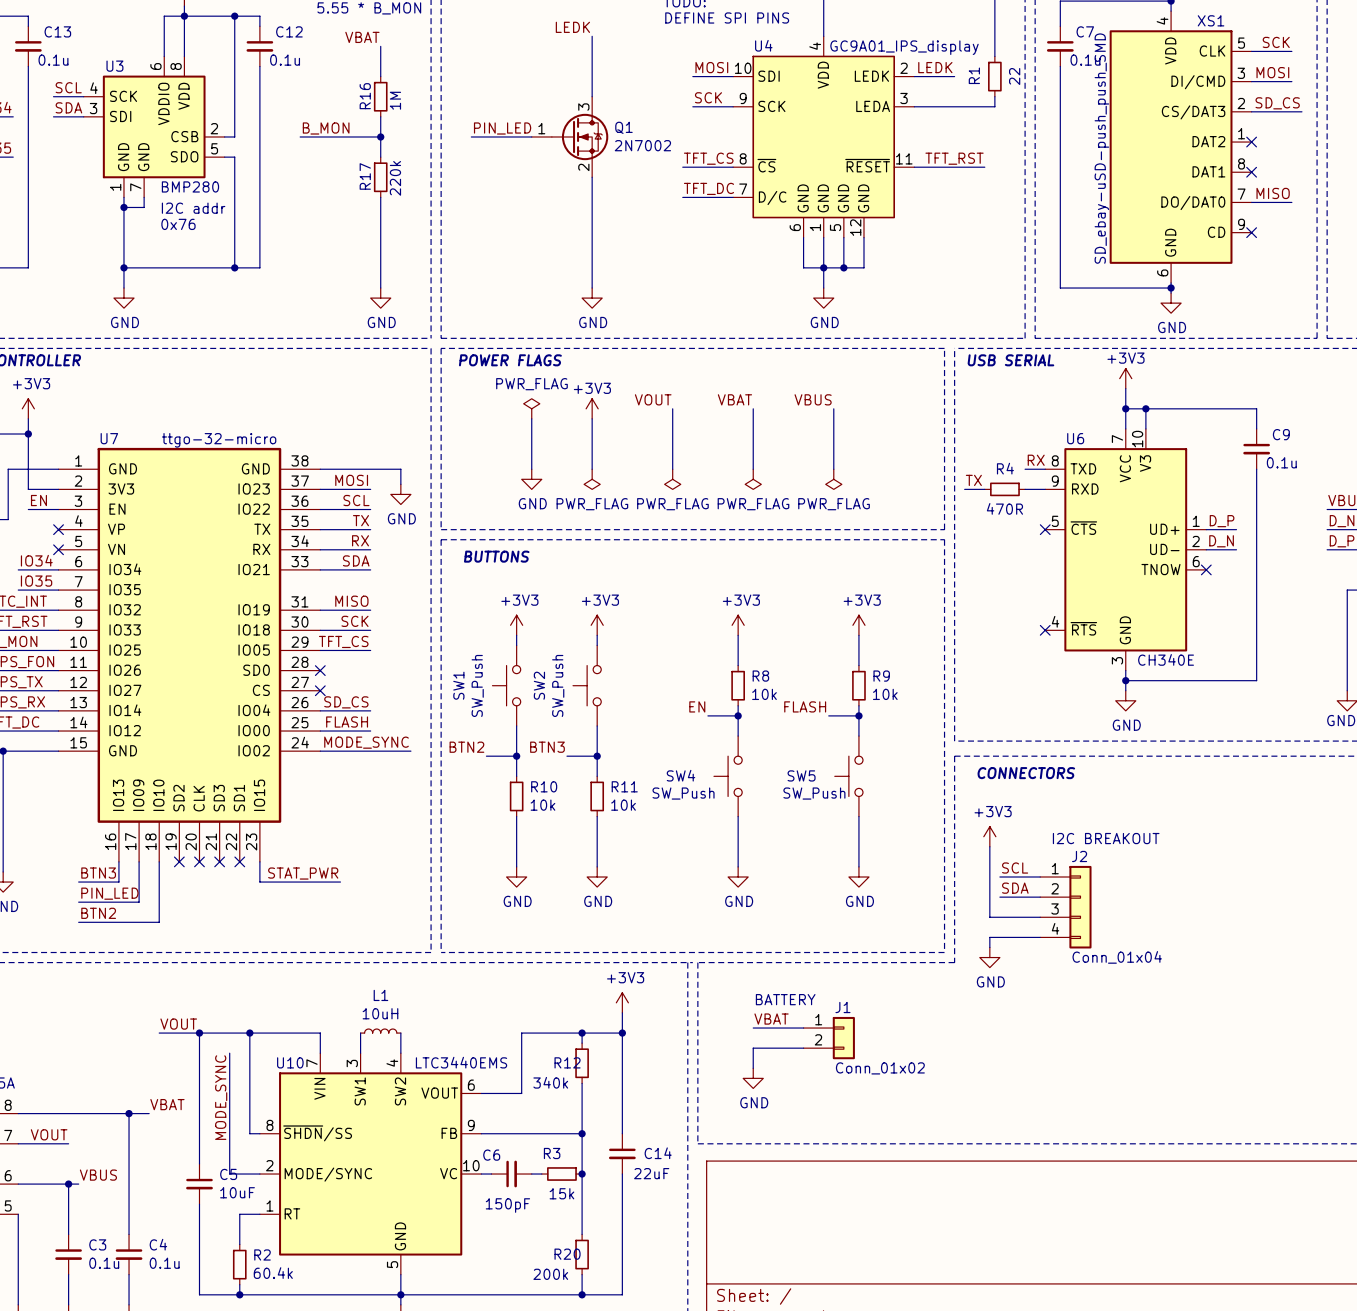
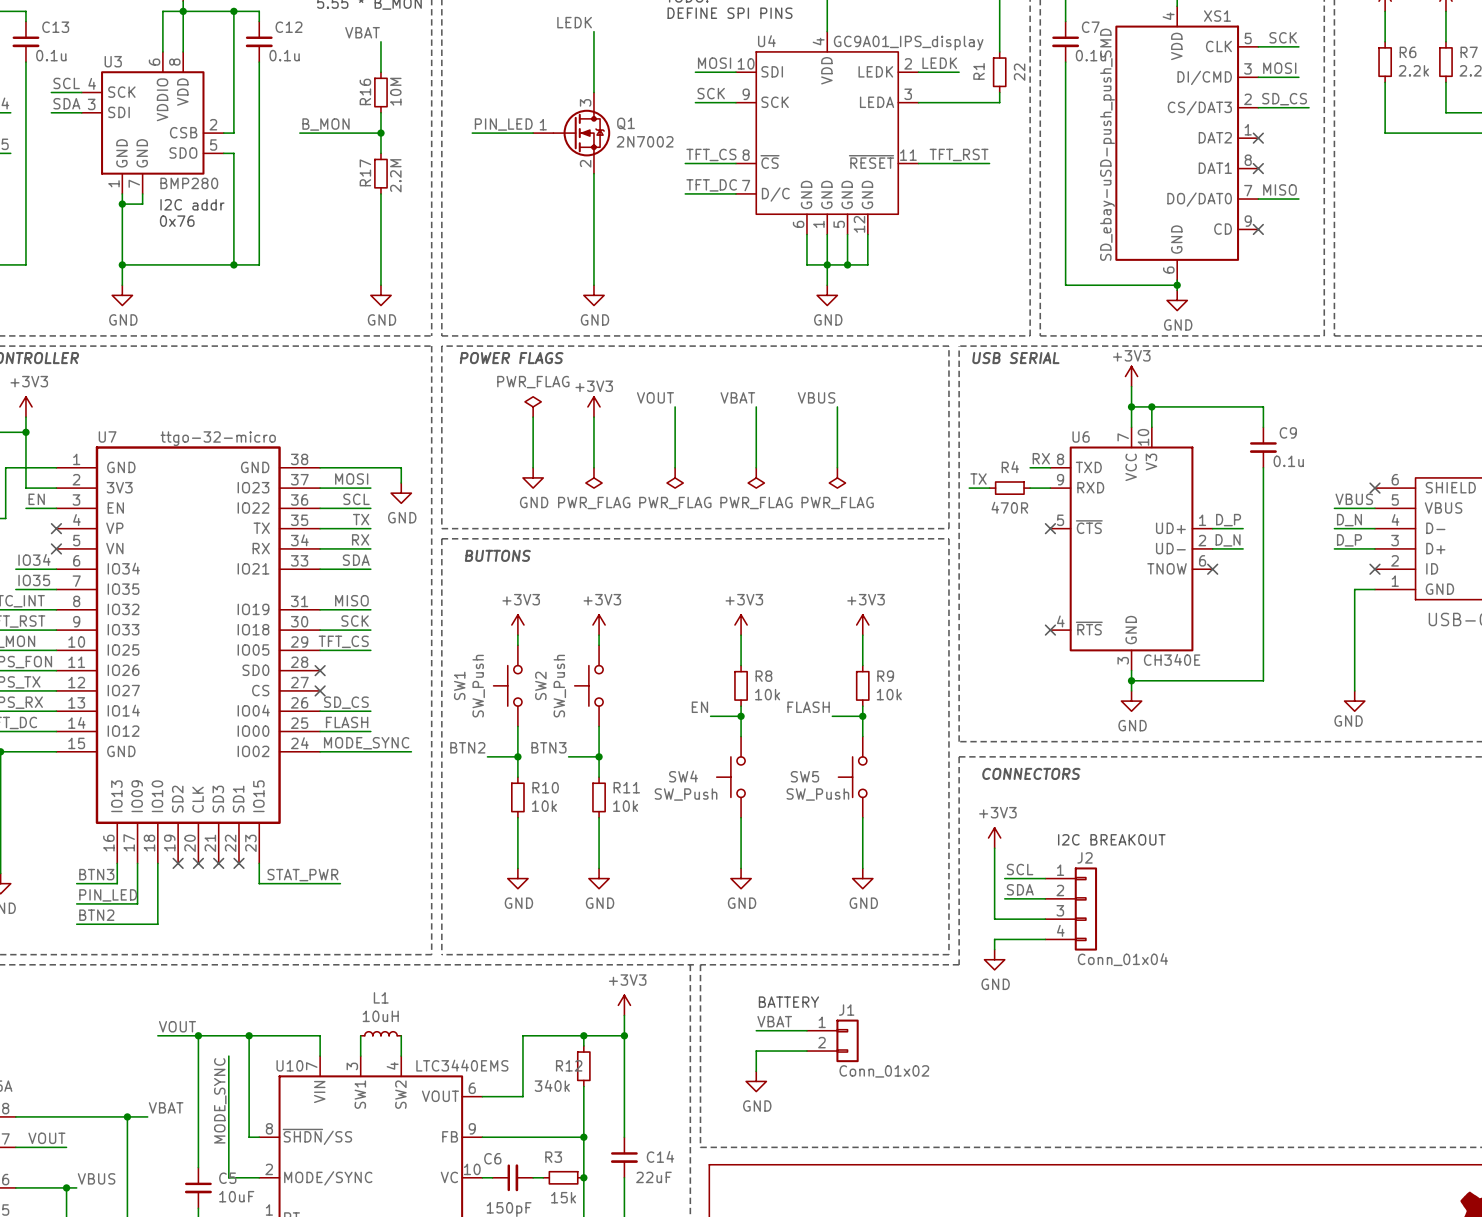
R16 value: 1M (395, 100) -> 10M (395, 91)
R17 value: 220k (395, 178) -> 2.2M (395, 175)

